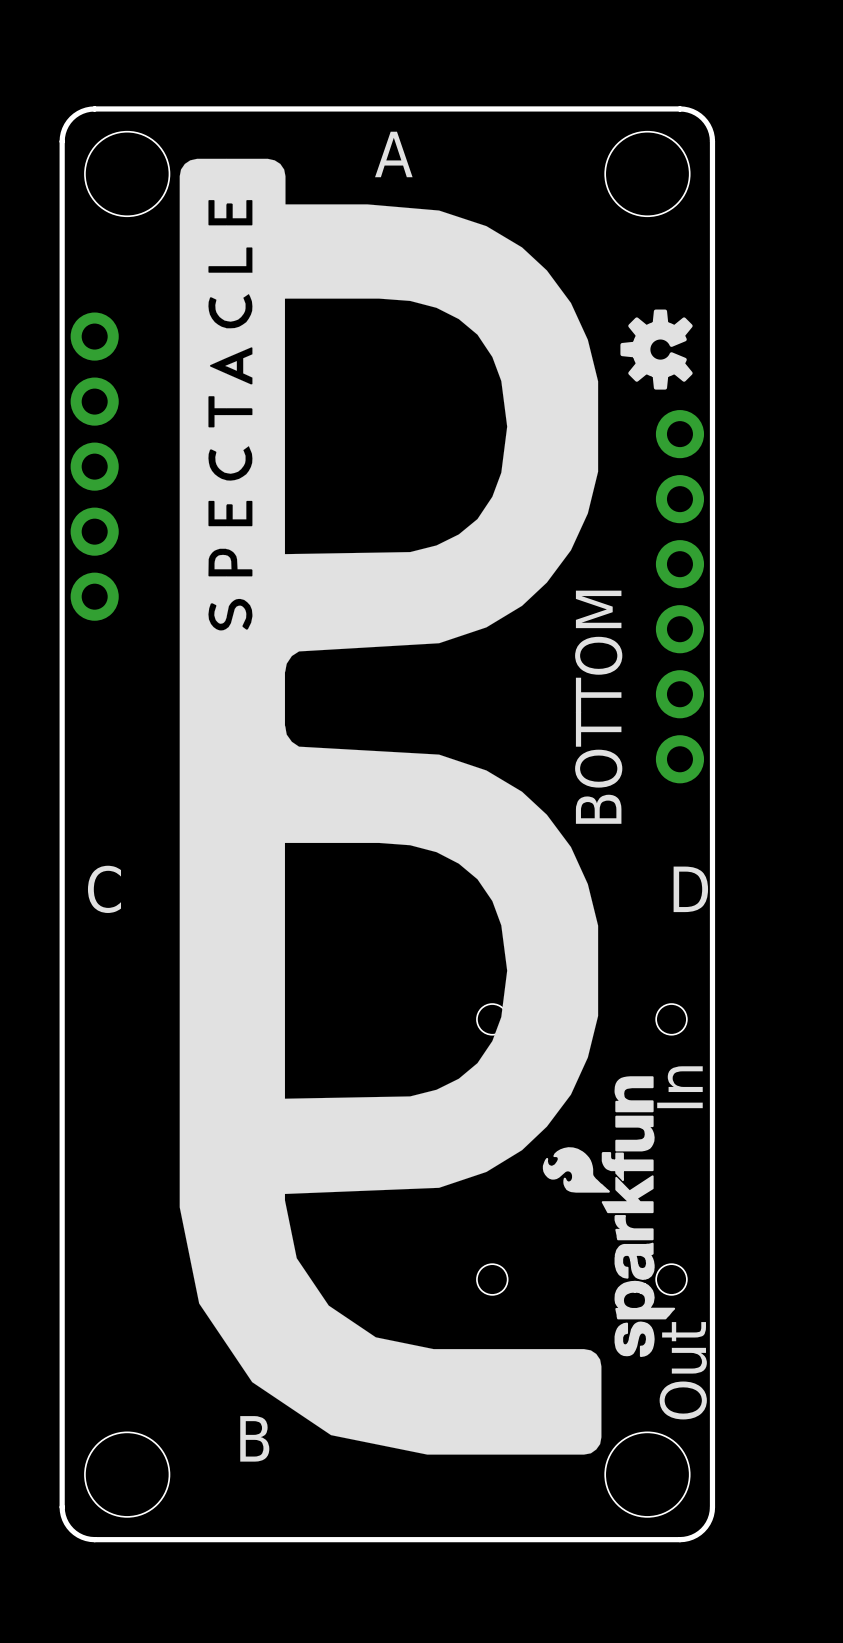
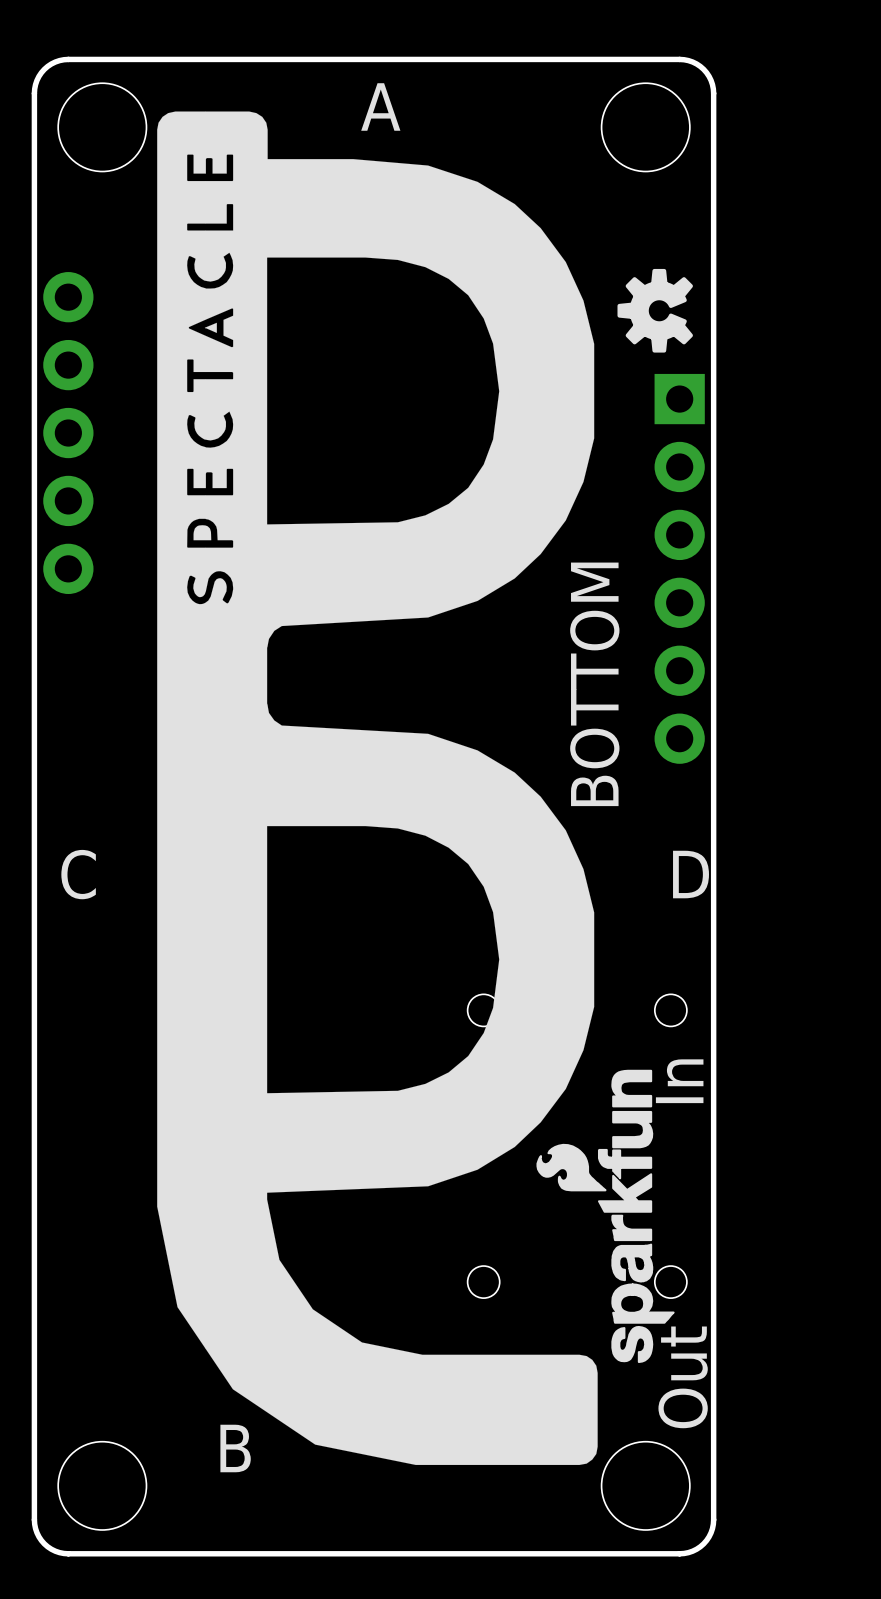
part footprint: [655, 410, 705, 784] -> [654, 373, 705, 764]

